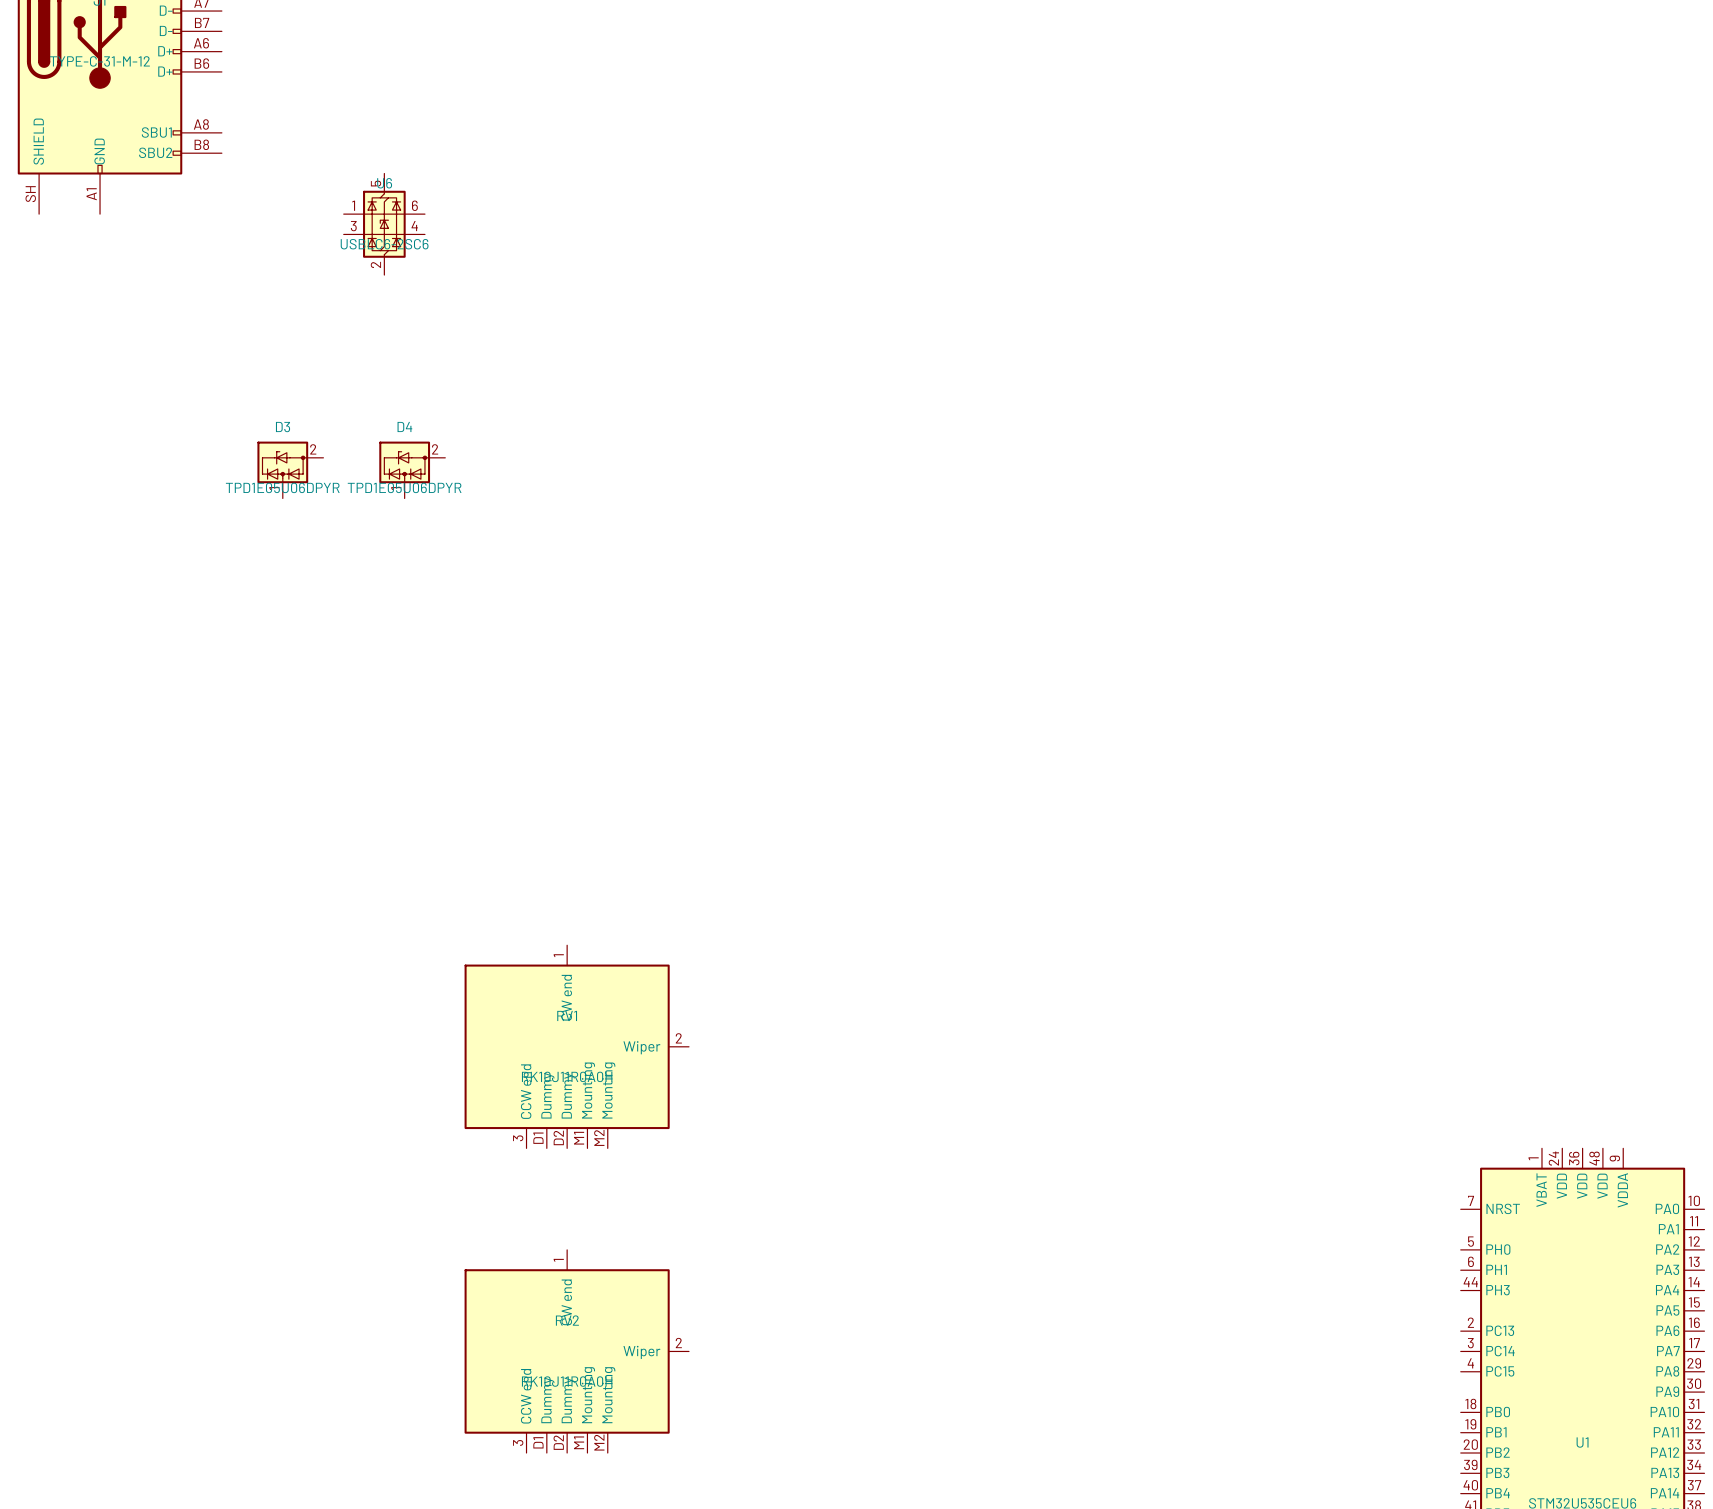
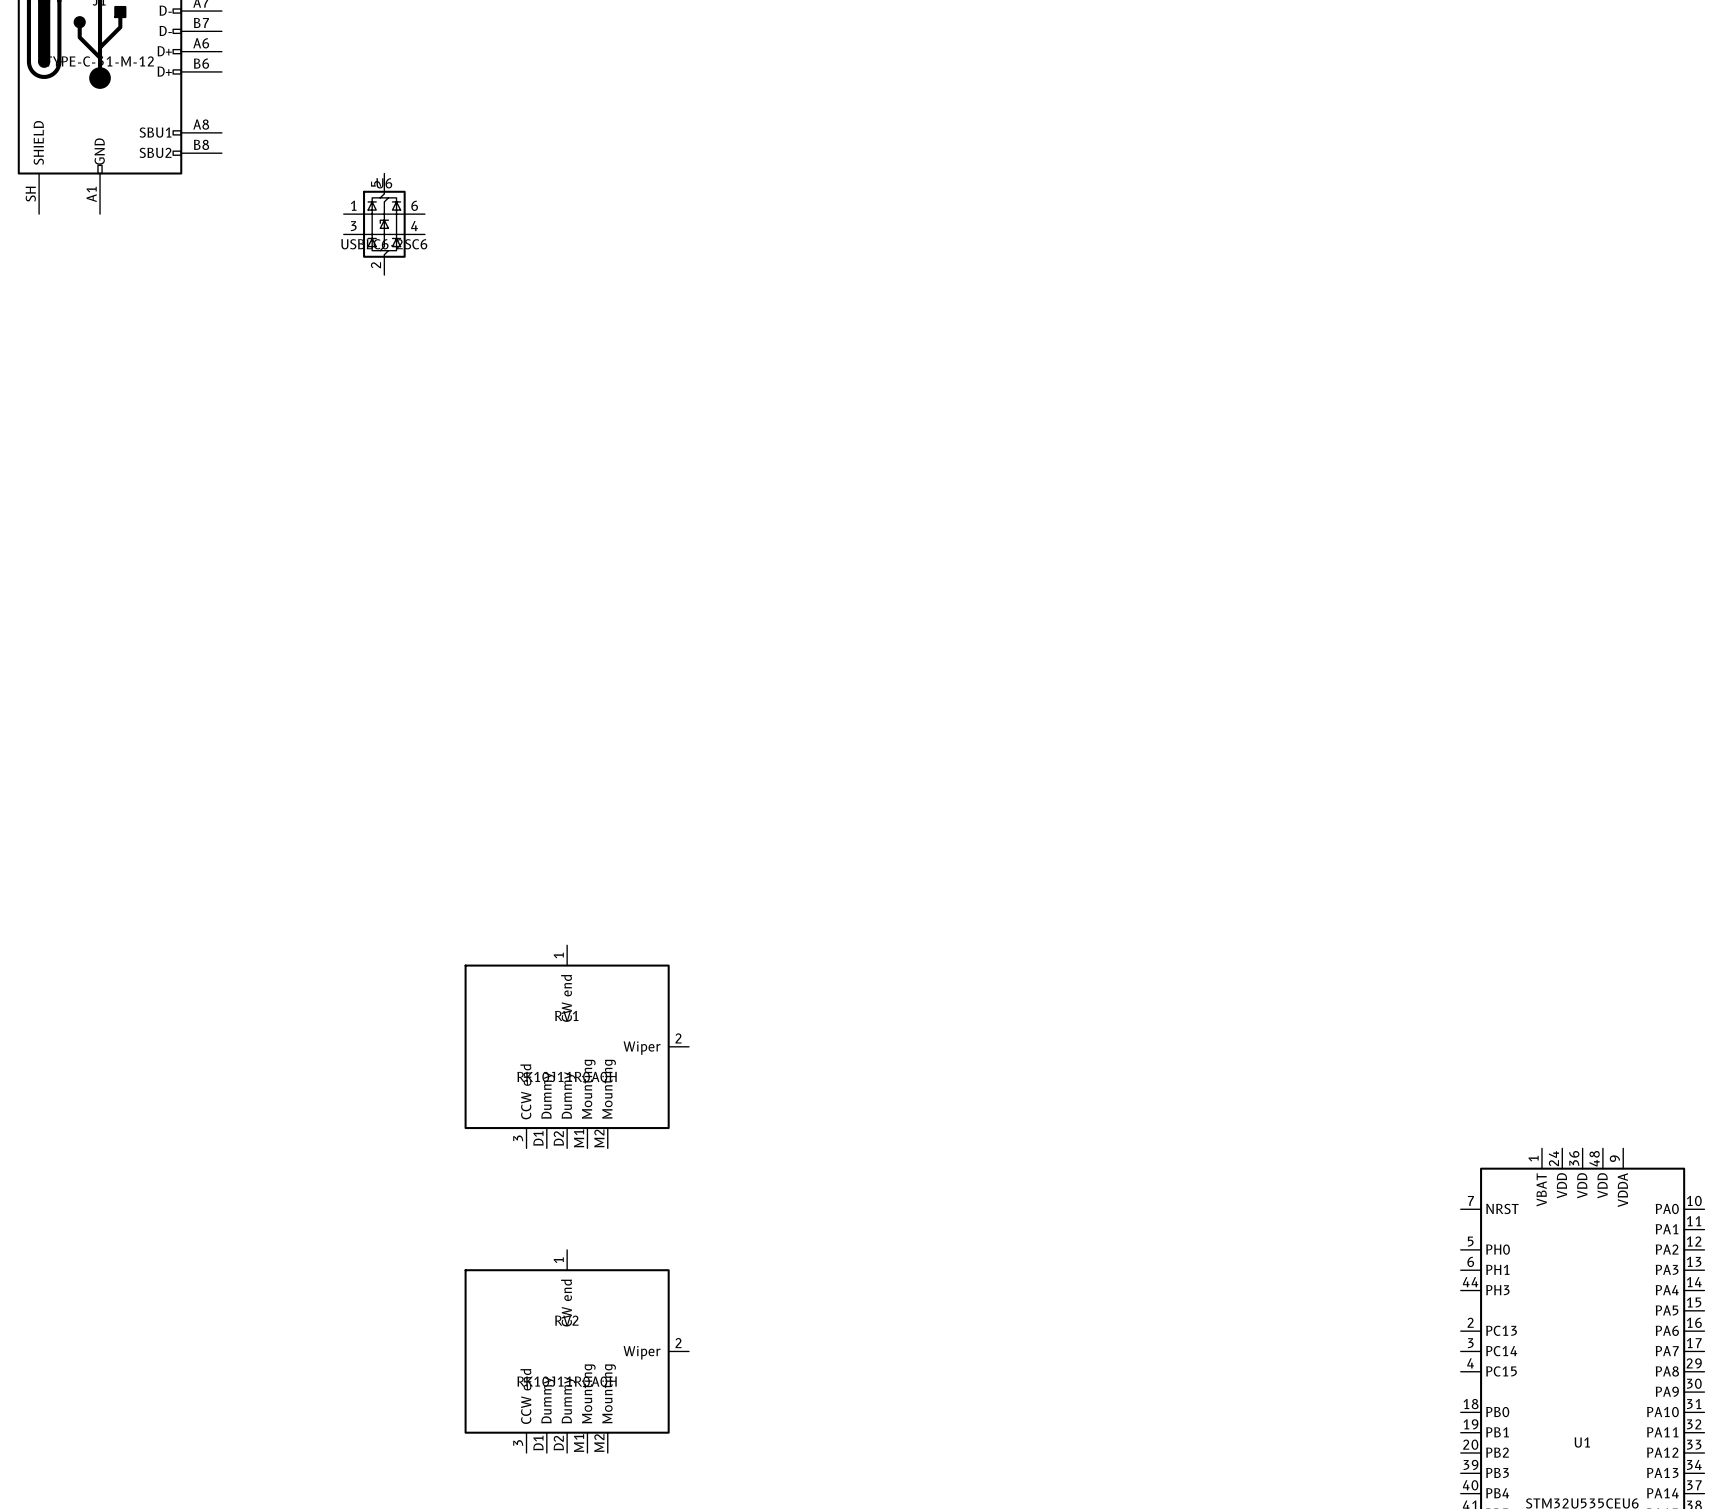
D3: TPD1E05U06DPYR (290, 470) -> none
D4: TPD1E05U06DPYR (412, 470) -> none

